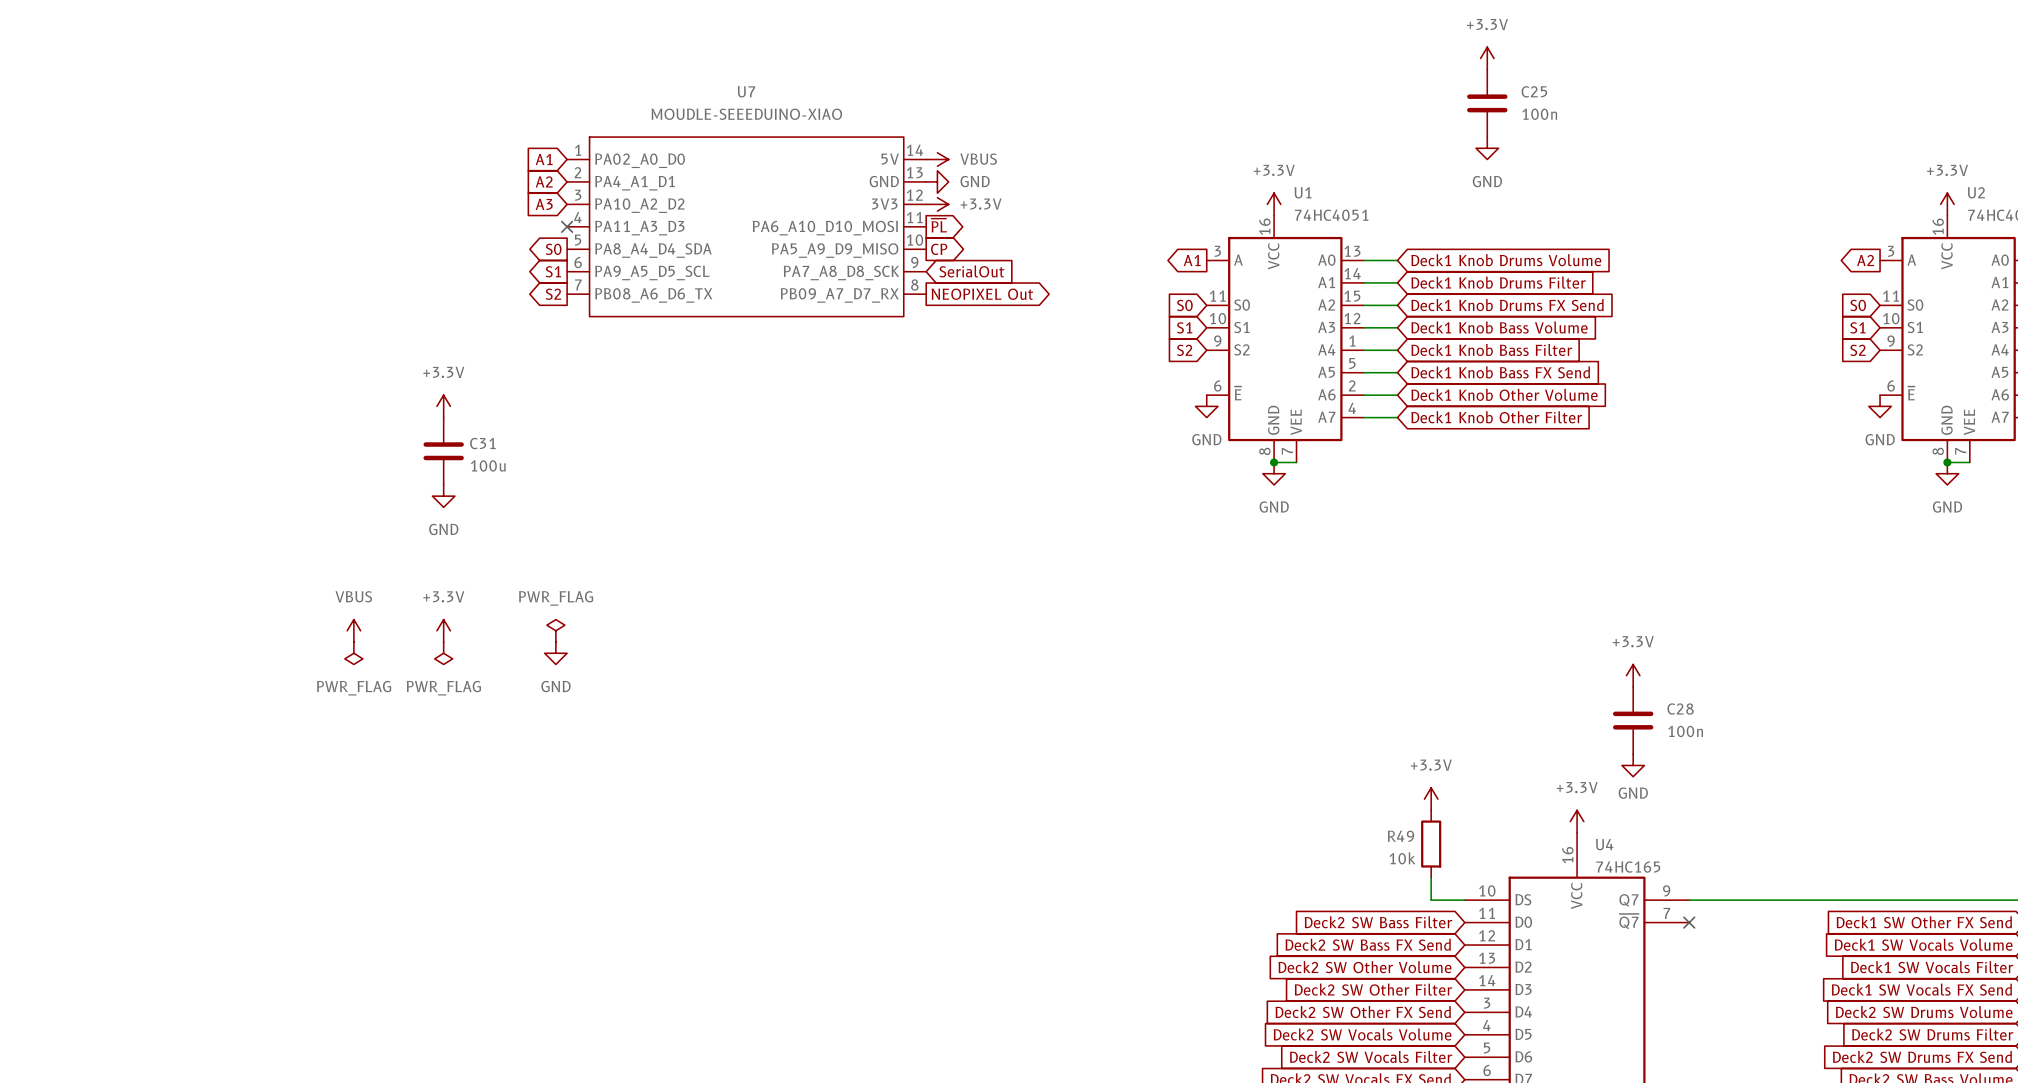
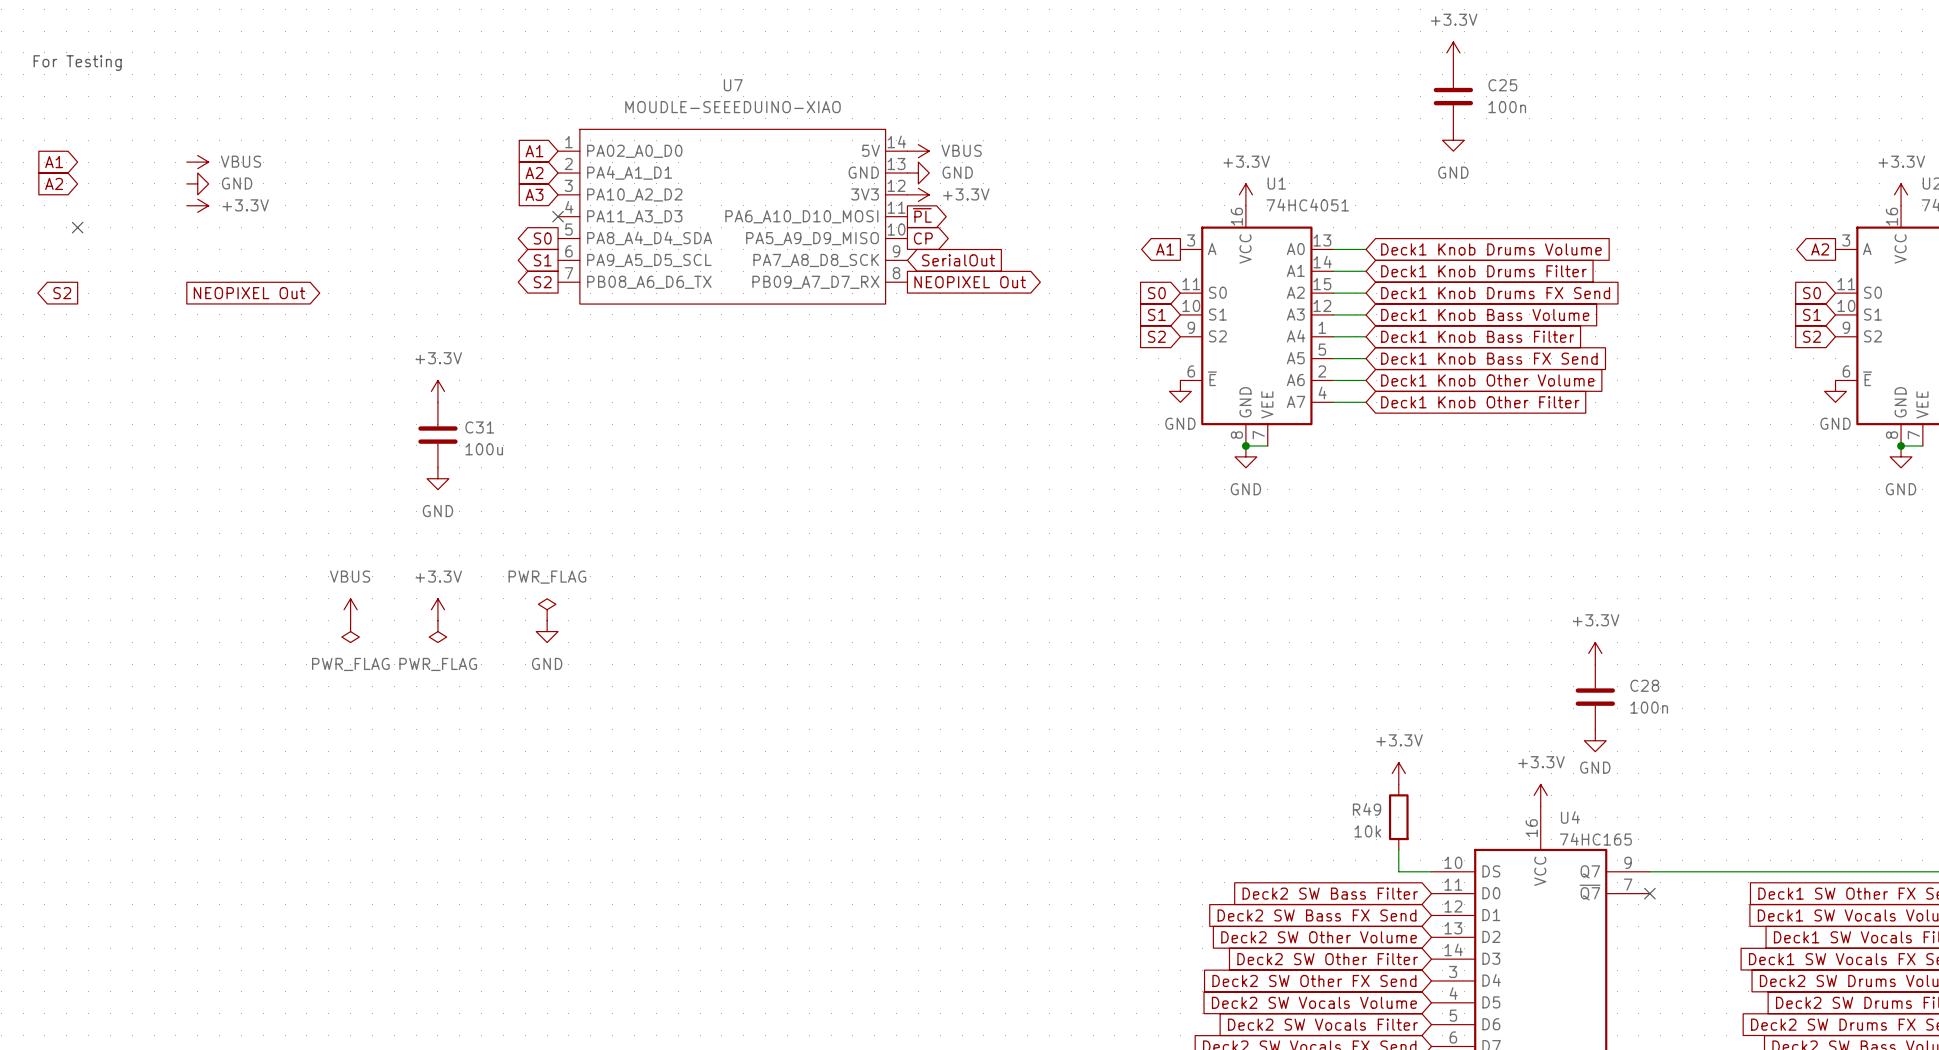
text: none -> For Testing (77, 63)
global label: none -> A1 (54, 162)
power symbol: none -> VBUS (197, 162)
global label: none -> A2 (54, 183)
power symbol: none -> GND (197, 183)
power symbol: none -> +3.3V (197, 205)
no-connect mark: none -> (77, 227)
global label: none -> S2 (62, 293)
global label: none -> NEOPIXEL Out (249, 293)

